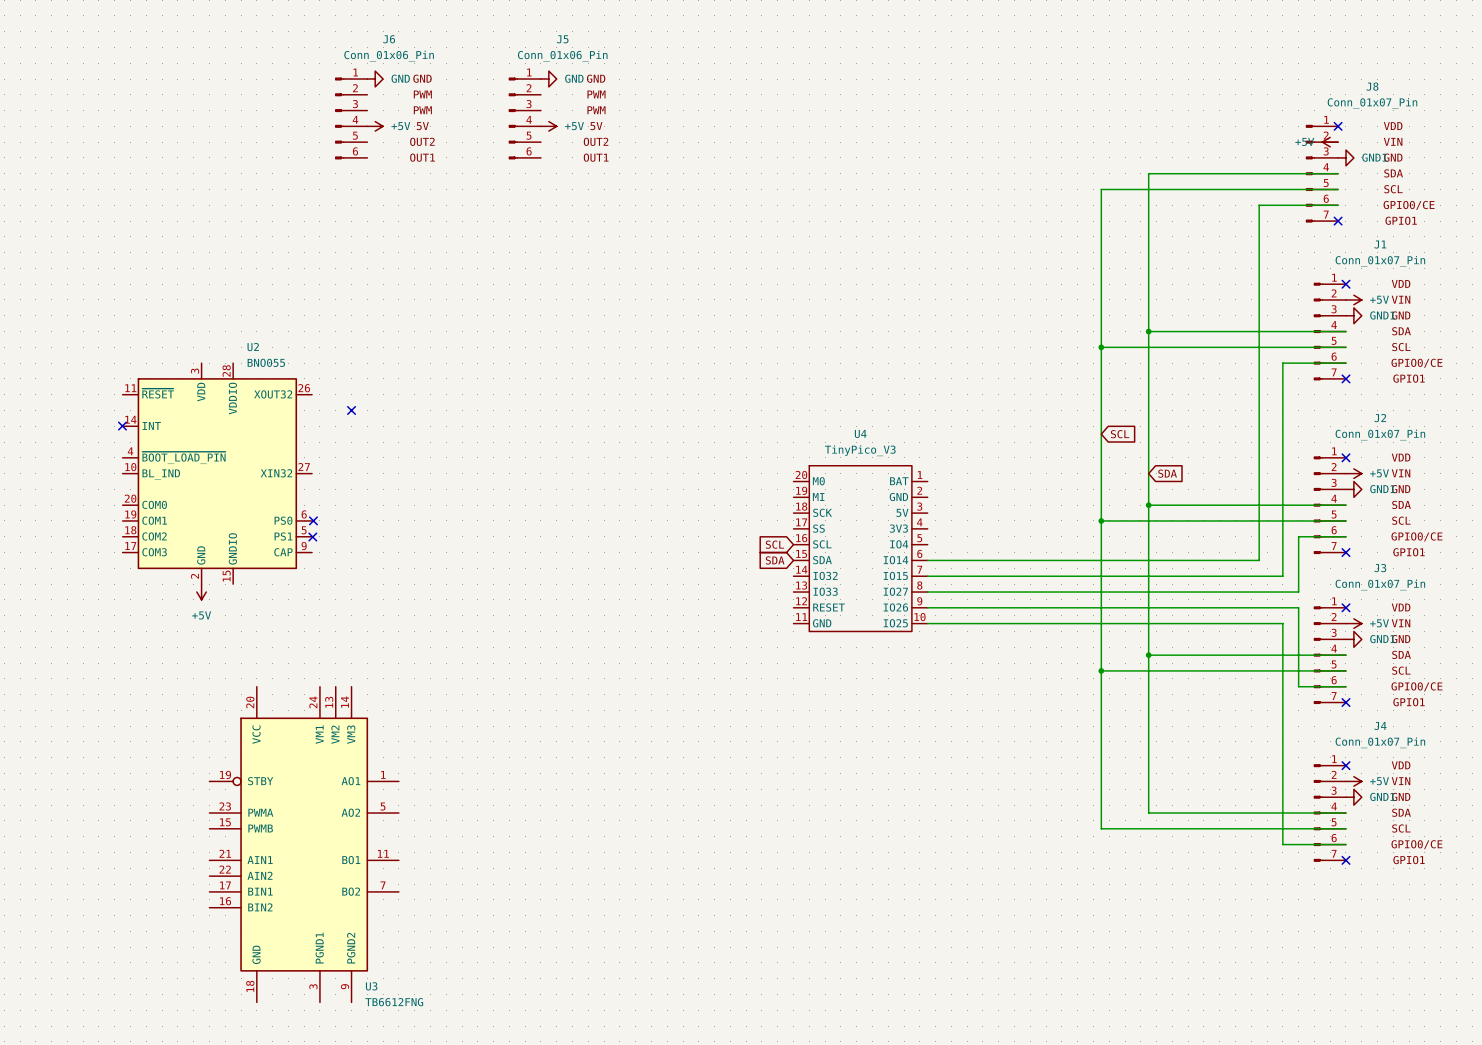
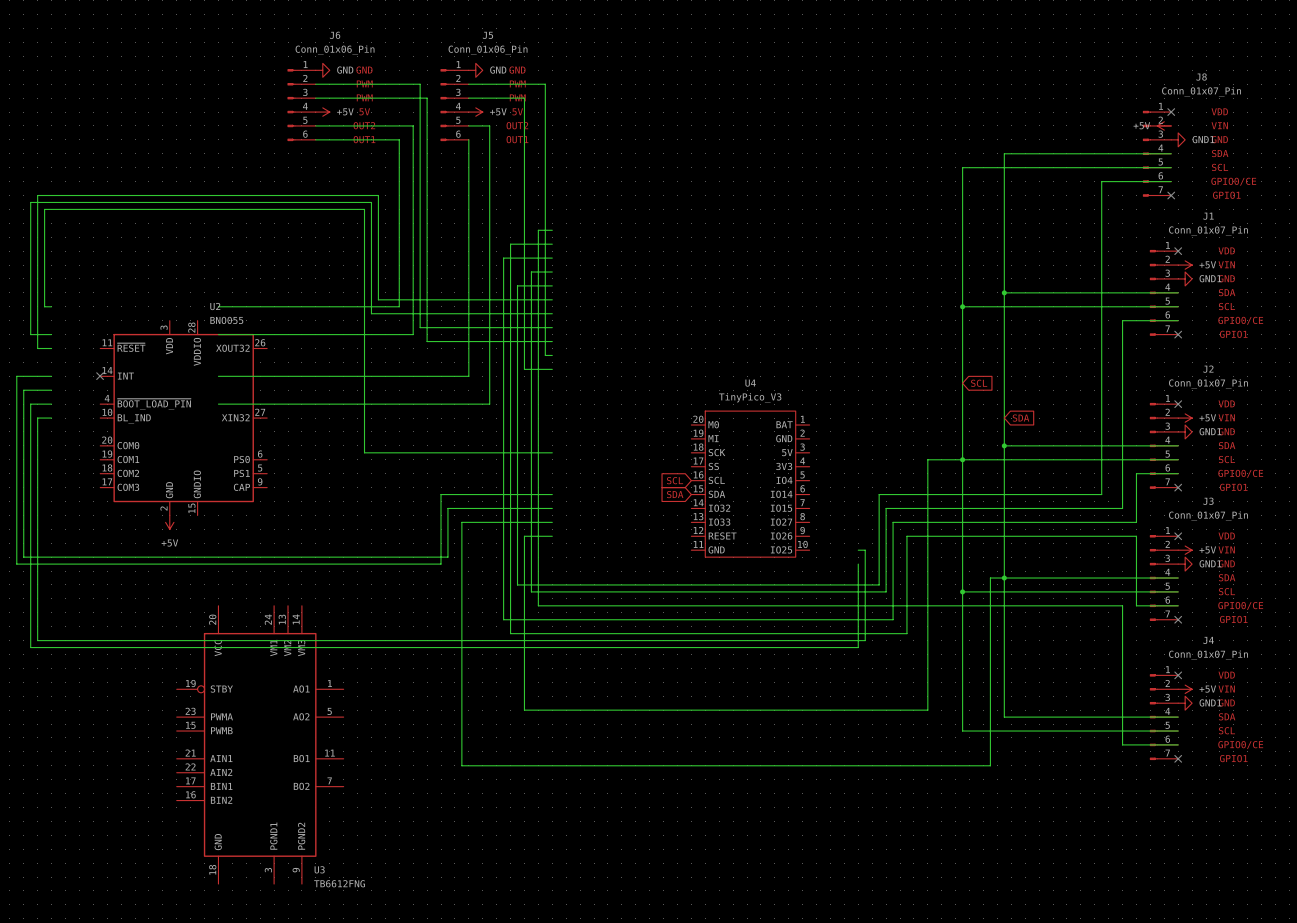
wire: none -> (315, 84) (420, 84) (420, 327) (552, 327)
wire: none -> (468, 84) (545, 84) (545, 355) (552, 355)
wire: none -> (315, 98) (427, 98) (427, 341) (552, 341)
wire: none -> (468, 98) (524, 98) (524, 369) (552, 369)
wire: none -> (315, 125) (413, 125) (413, 334) (218, 334)
wire: none -> (468, 125) (489, 125) (489, 404) (218, 404)
wire: none -> (315, 139) (399, 139) (399, 306) (218, 306)
wire: none -> (468, 139) (468, 376) (218, 376)
wire: none -> (552, 299) (378, 299) (378, 195) (37, 195) (37, 348) (51, 348)
wire: none -> (51, 306) (44, 306) (44, 209) (364, 209) (364, 452) (552, 452)
wire: none -> (552, 313) (371, 313) (371, 202) (30, 202) (30, 334) (51, 334)
no-connect mark: (351, 410) -> none
wire: none -> (51, 376) (16, 376) (16, 564) (441, 564) (441, 494) (552, 494)
wire: none -> (51, 390) (23, 390) (23, 557) (447, 557) (447, 508) (552, 508)
wire: none -> (51, 404) (30, 404) (30, 647) (858, 647) (858, 564)
wire: none -> (51, 418) (37, 418) (37, 640) (865, 640) (865, 550)
no-connect mark: (313, 520) -> none
wire: none -> (962, 459) (927, 459) (927, 710) (524, 710) (524, 536) (552, 536)
no-connect mark: (312, 537) -> none
wire: (927, 560) (1006, 560) -> (552, 285) (517, 285) (517, 584) (879, 584) (879, 494)
wire: (927, 576) (1014, 576) -> (552, 272) (531, 272) (531, 591) (886, 591) (886, 508)
wire: none -> (552, 522) (461, 522) (461, 765) (990, 765) (990, 578) (1004, 578)
wire: (927, 592) (1022, 592) -> (552, 258) (503, 258) (503, 619) (893, 619) (893, 522)
wire: (927, 607) (1038, 607) -> (552, 244) (510, 244) (510, 633) (906, 633) (906, 536)
wire: (927, 623) (982, 623) -> none
wire: (990, 623) (1282, 623) (1282, 686) -> (552, 230) (538, 230) (538, 605) (1122, 605)

